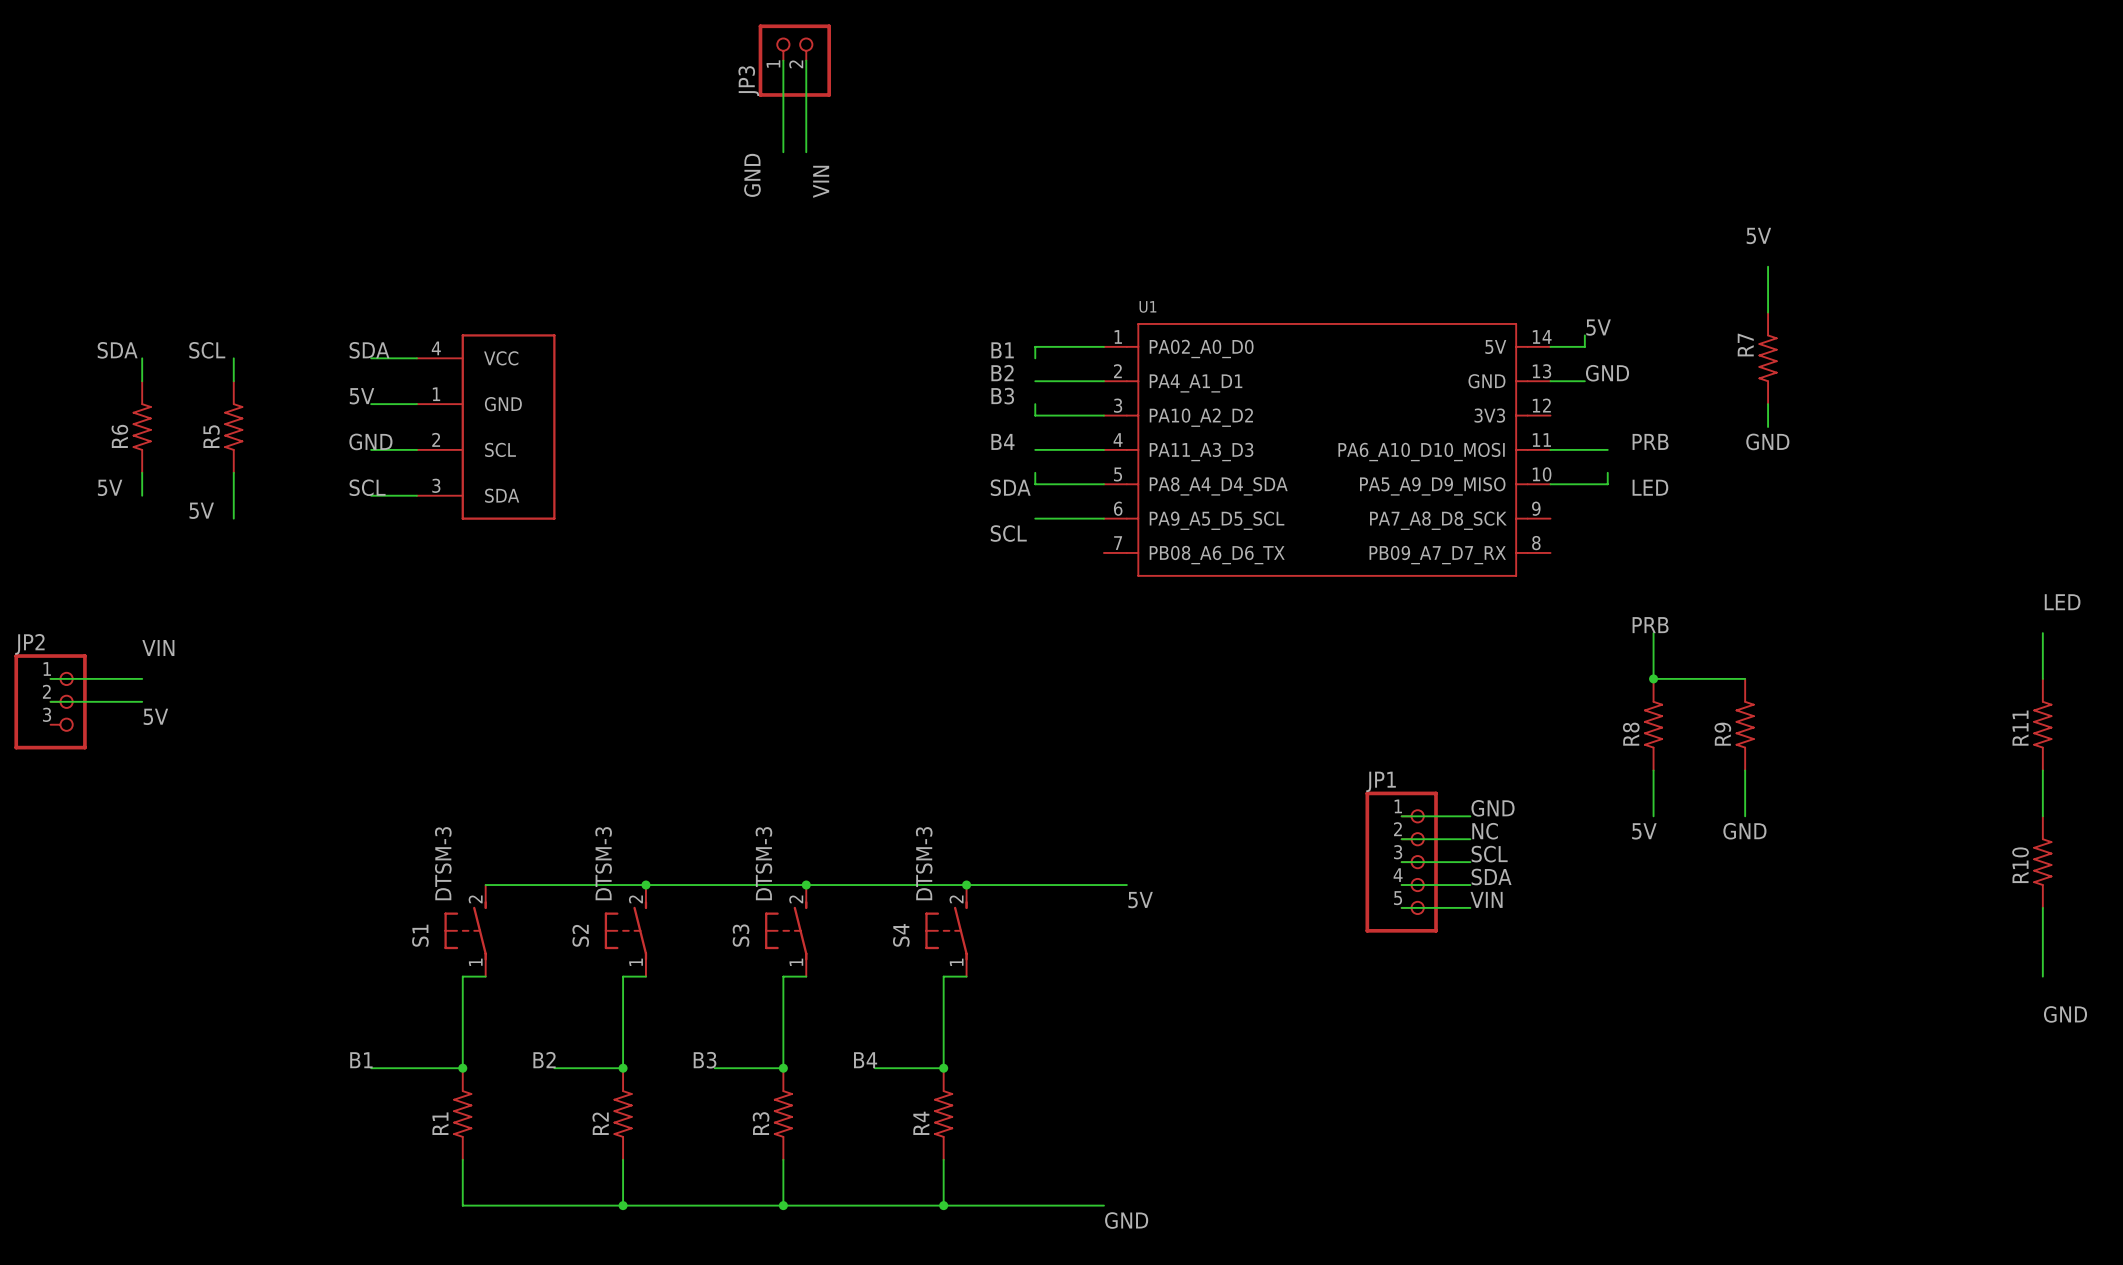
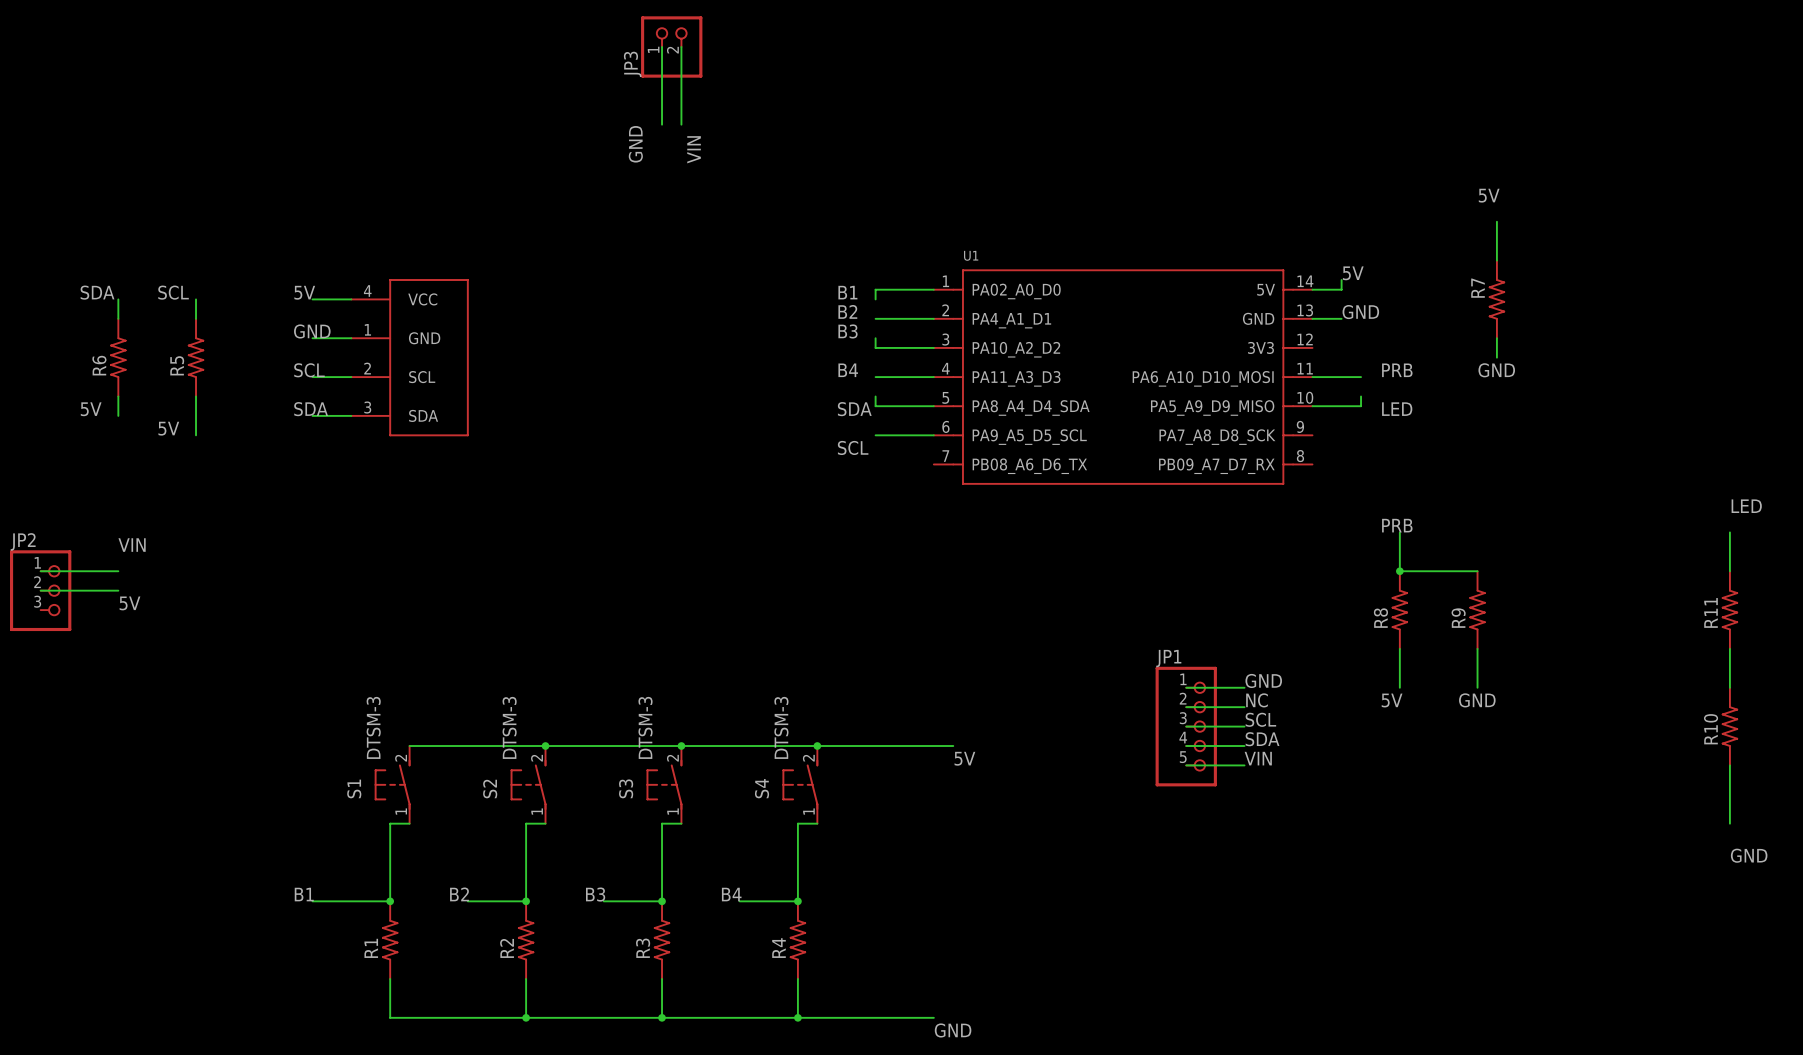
label: SDA (369, 350) -> 5V (304, 292)
label: 5V (362, 396) -> GND (312, 331)
label: GND (370, 441) -> SCL (309, 370)
label: SCL (367, 487) -> SDA (311, 409)

